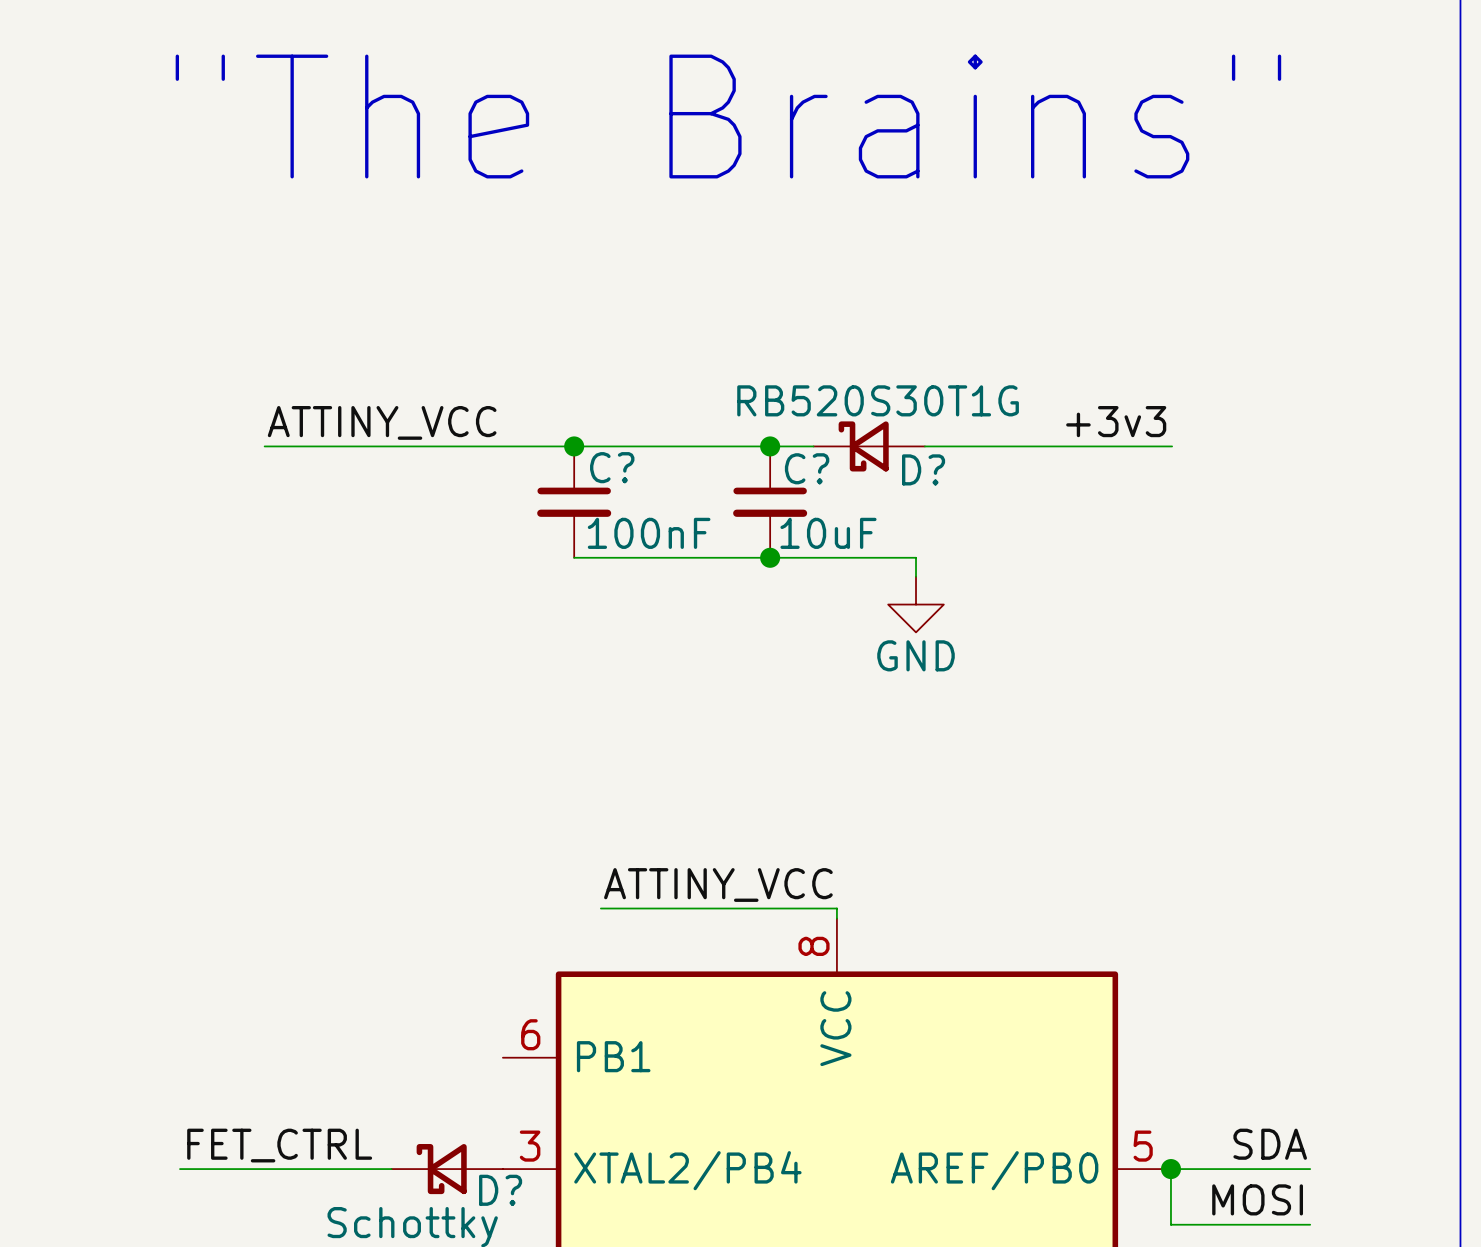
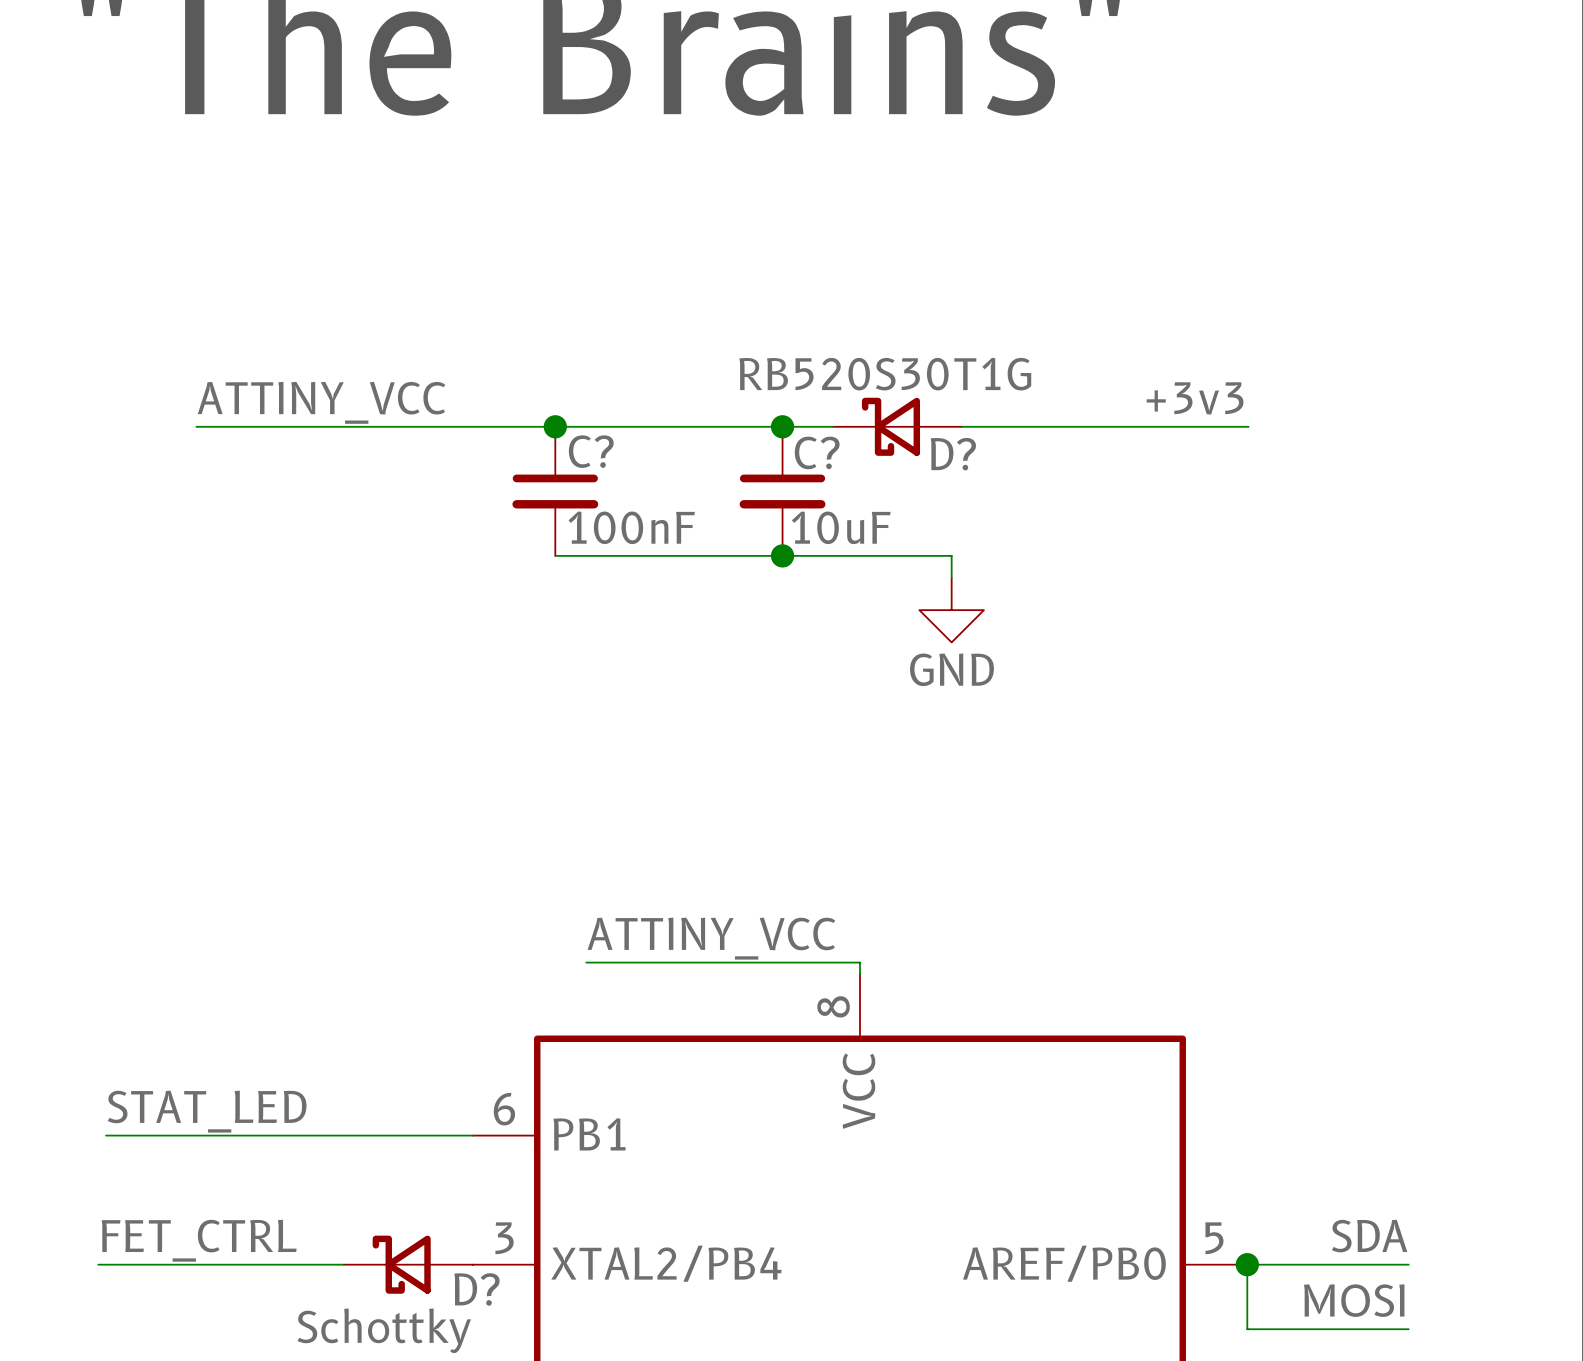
label: none -> STAT_LED (207, 1111)
wire: none -> (106, 1135) (472, 1135)

